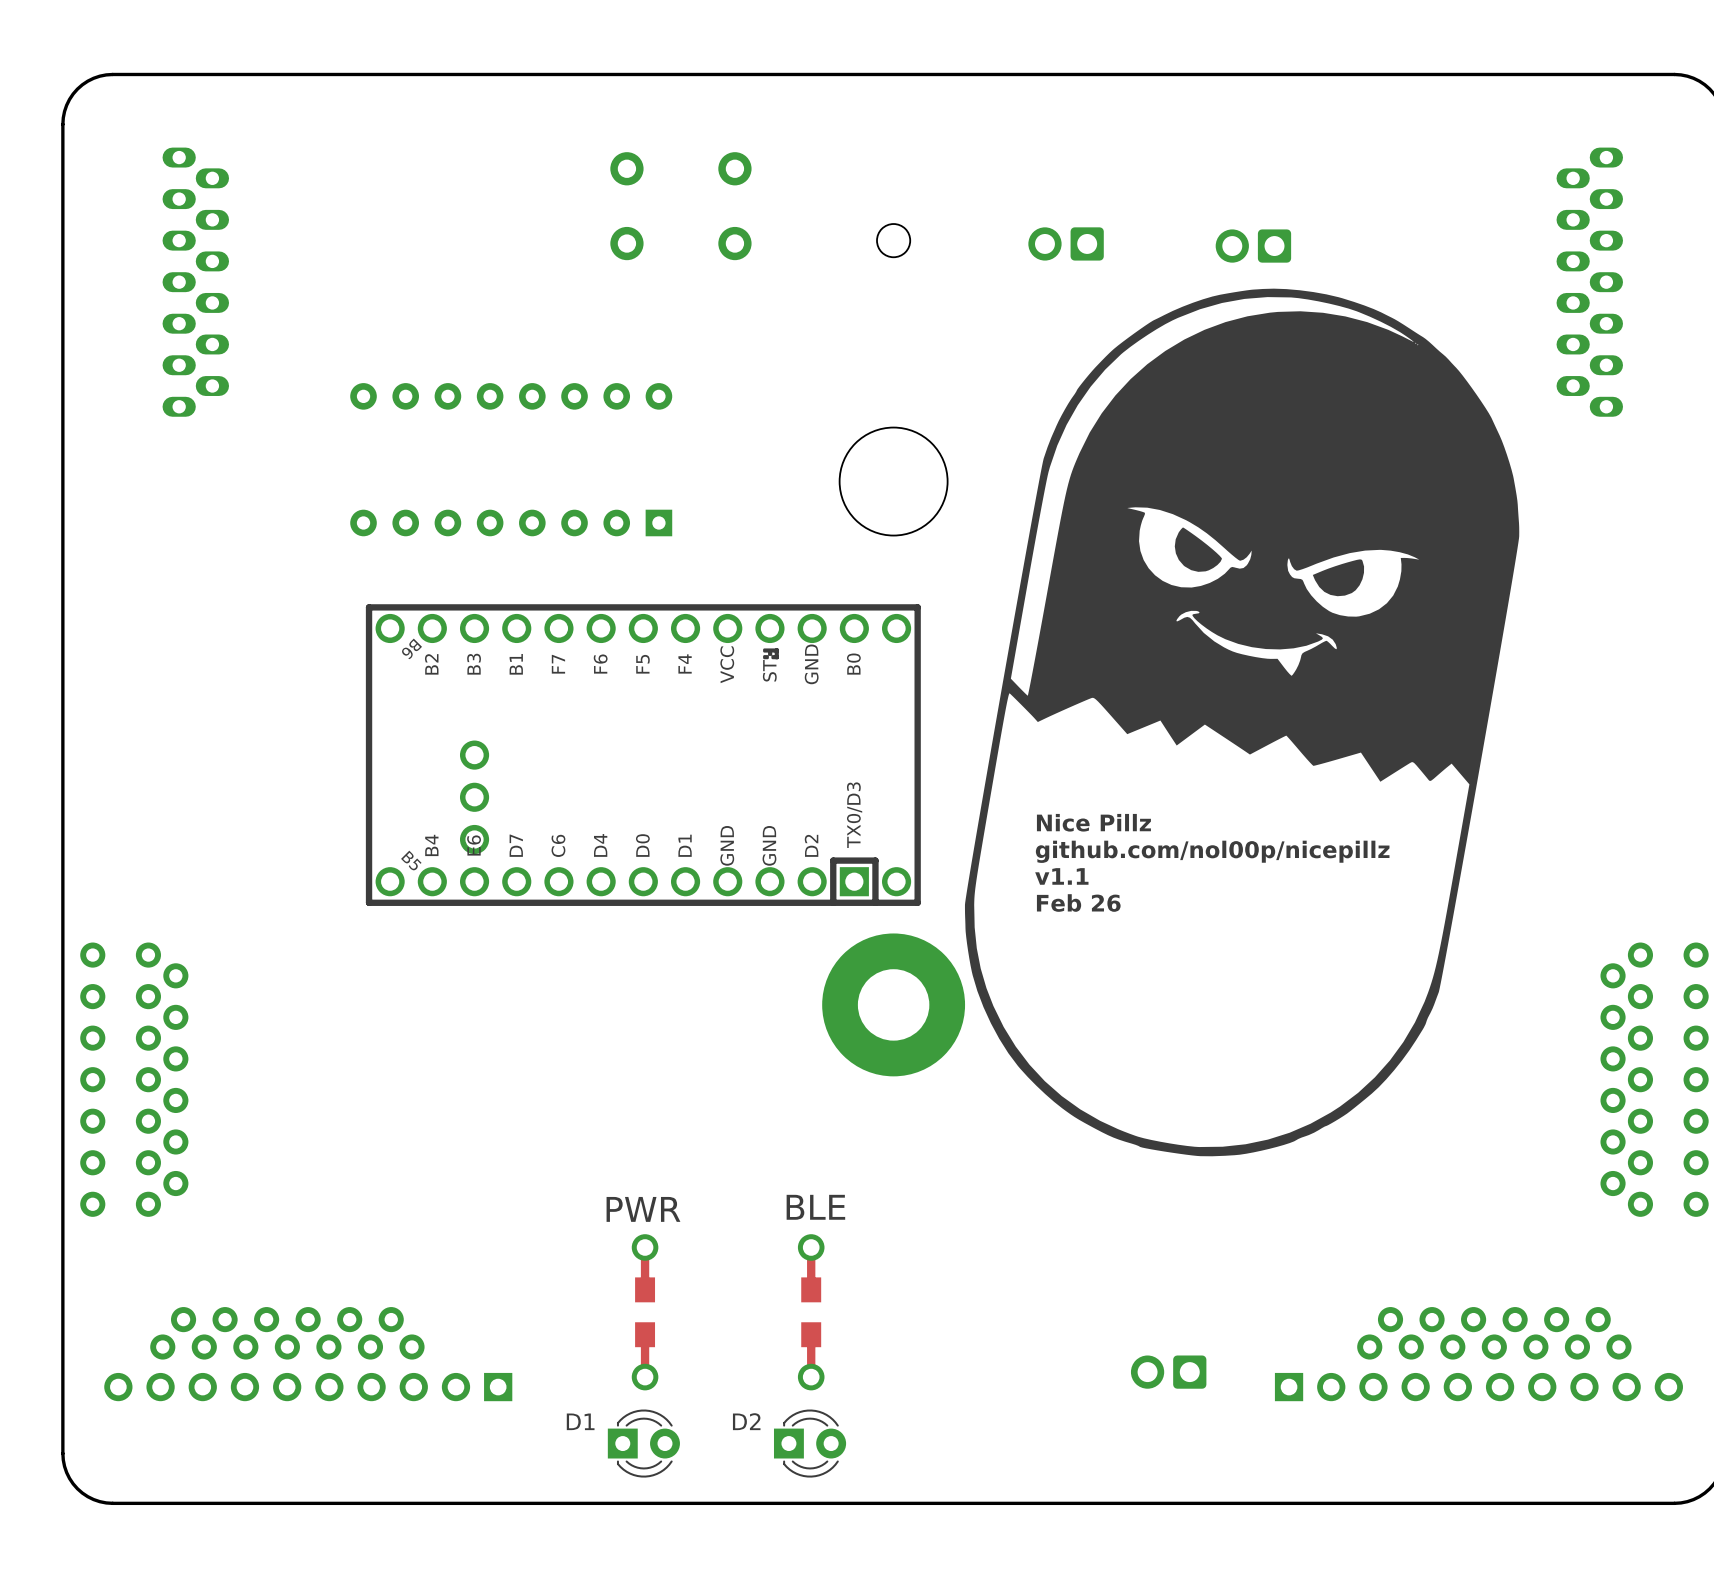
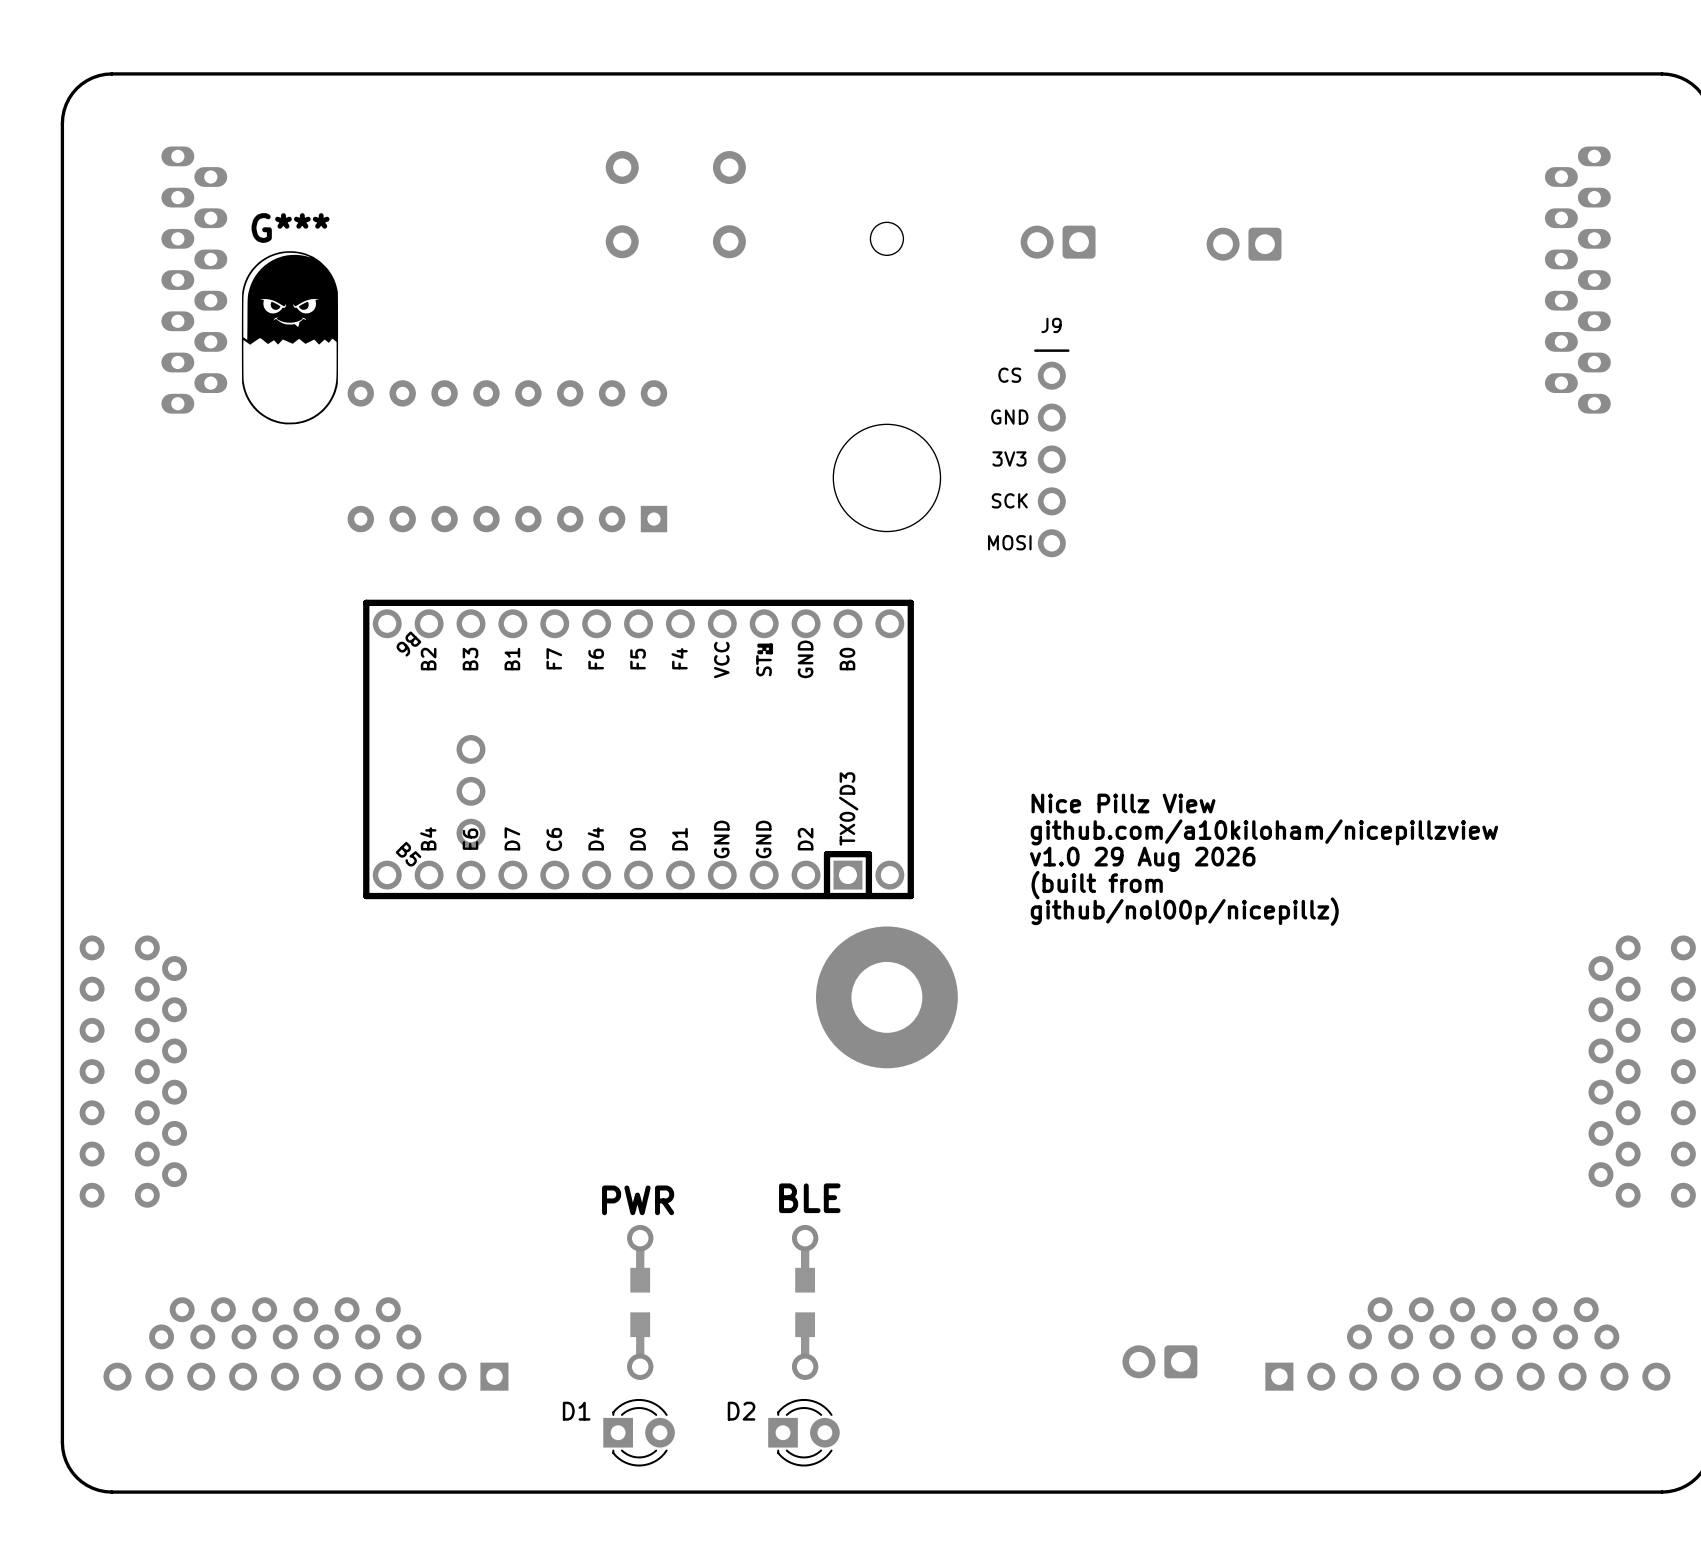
G***: none -> (289, 337)
J9: none -> (1051, 453)
part footprint: [365, 604, 921, 906] -> [363, 599, 914, 900]
part: (1242, 722) -> none
text: Nice Pillz (1093, 822) -> Nice Pillz View (1123, 803)
text: github.com/nol00p/nicepillz (1212, 851) -> github.com/a10kiloham/nicepillzview (1264, 832)
text: none -> v1.0 29 Aug 2026 (1142, 859)
text: v1.1 (1061, 876) -> none
text: none -> (built from (1097, 885)
text: Feb 26 (1078, 903) -> none
text: none -> github/nol00p/nicepillz) (1184, 911)

